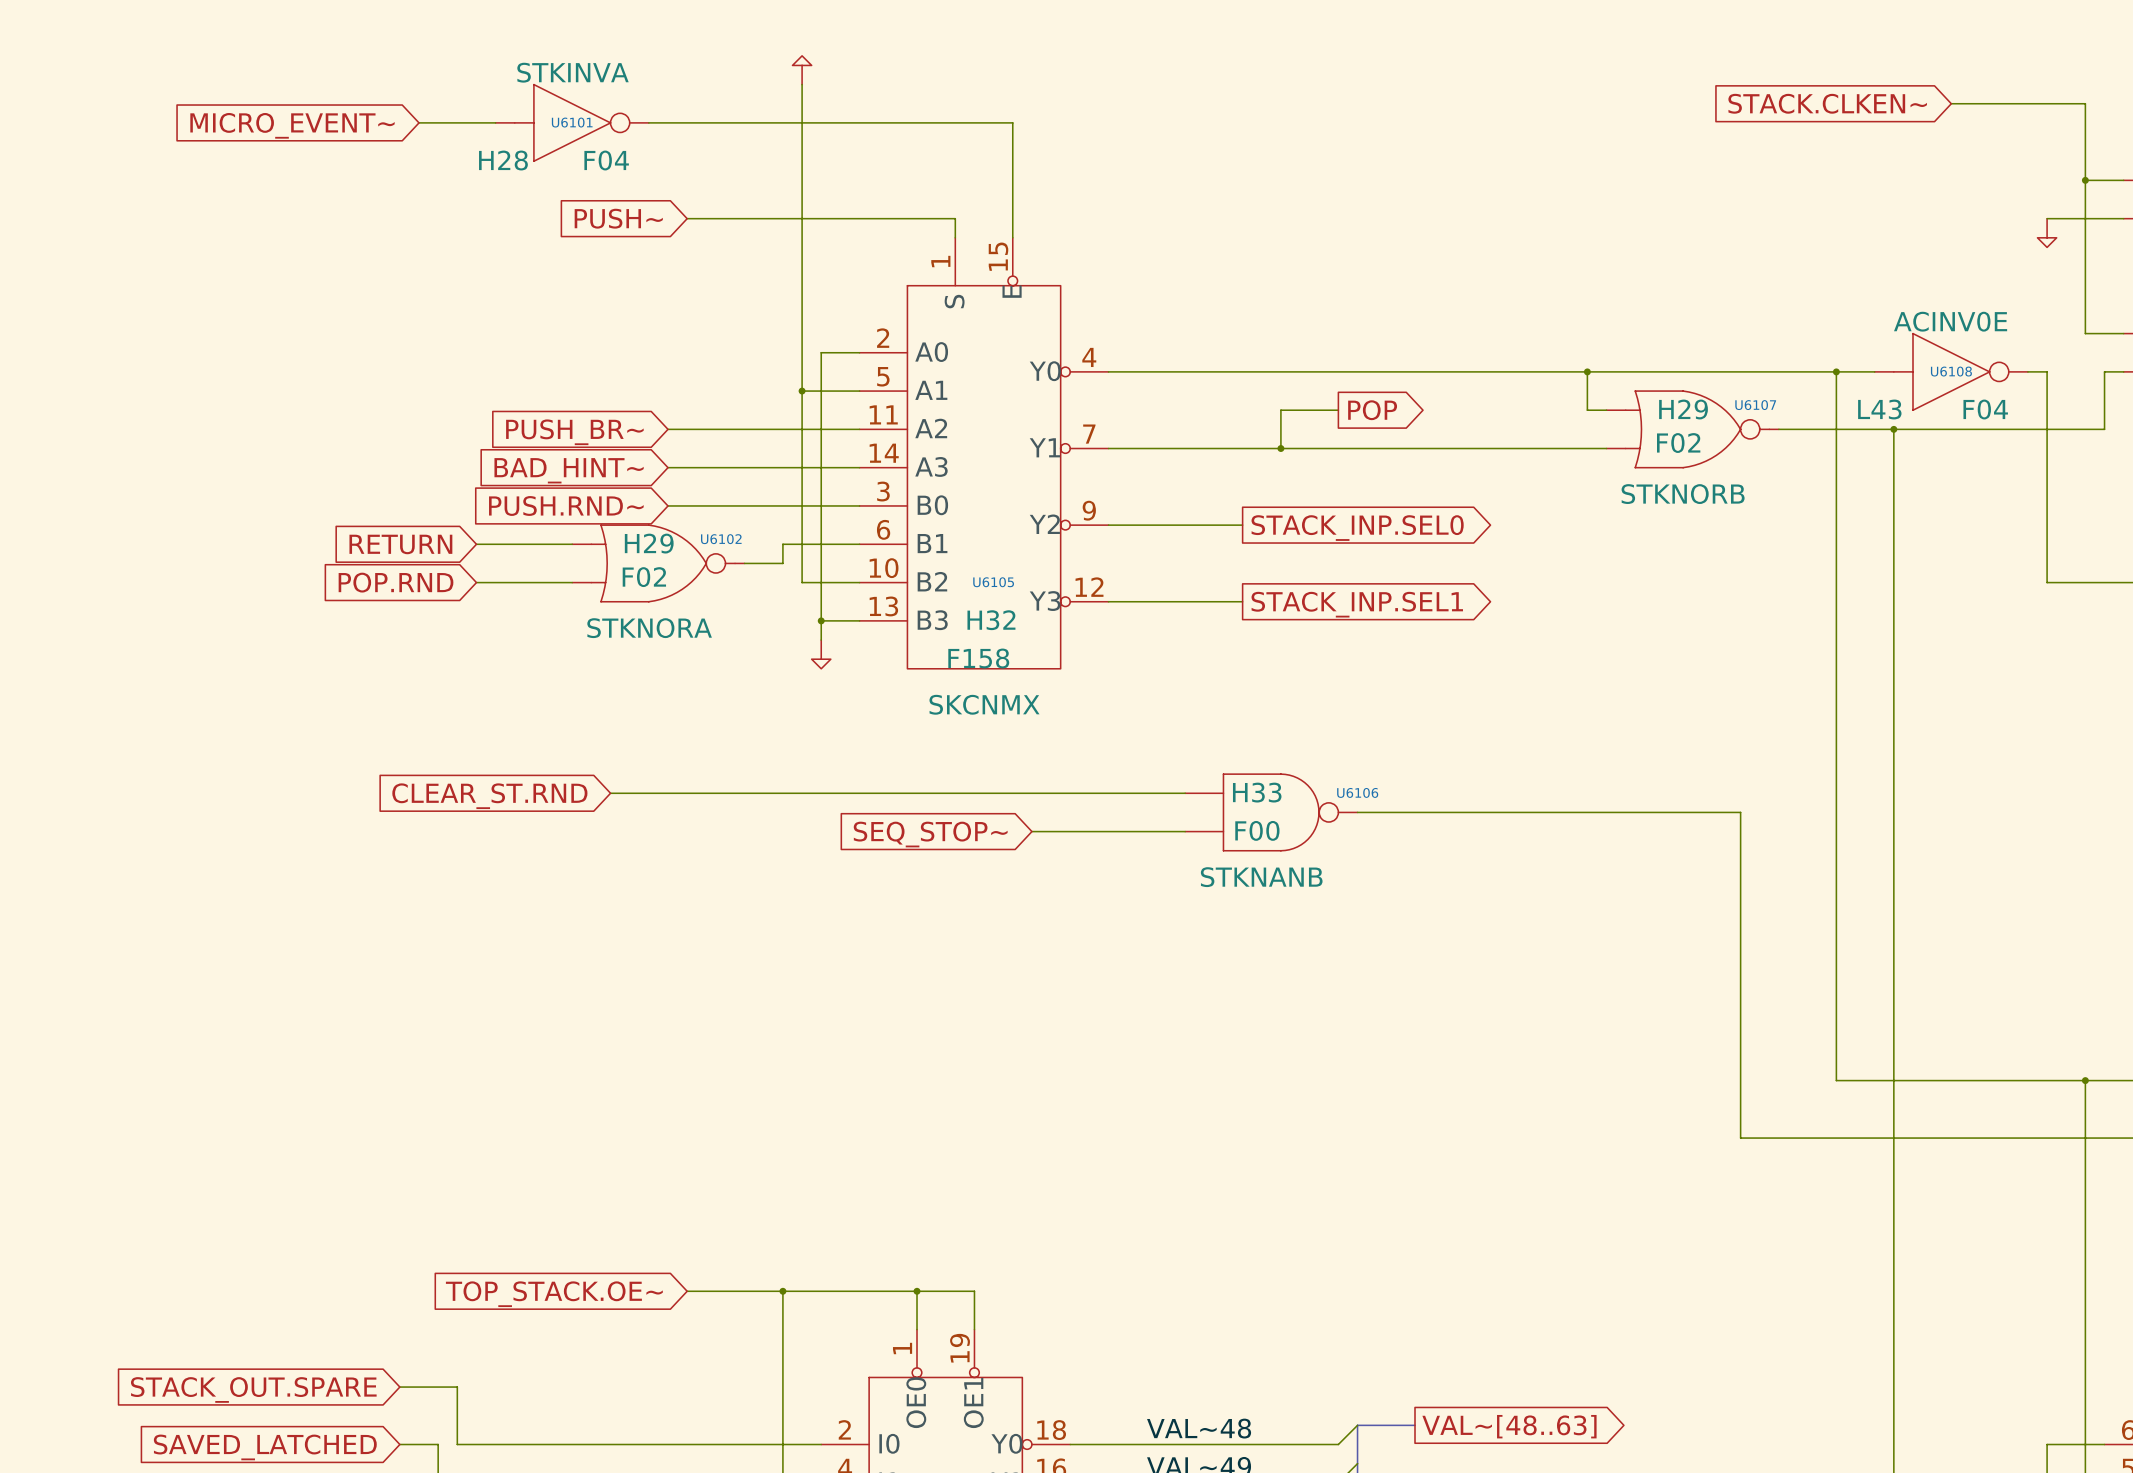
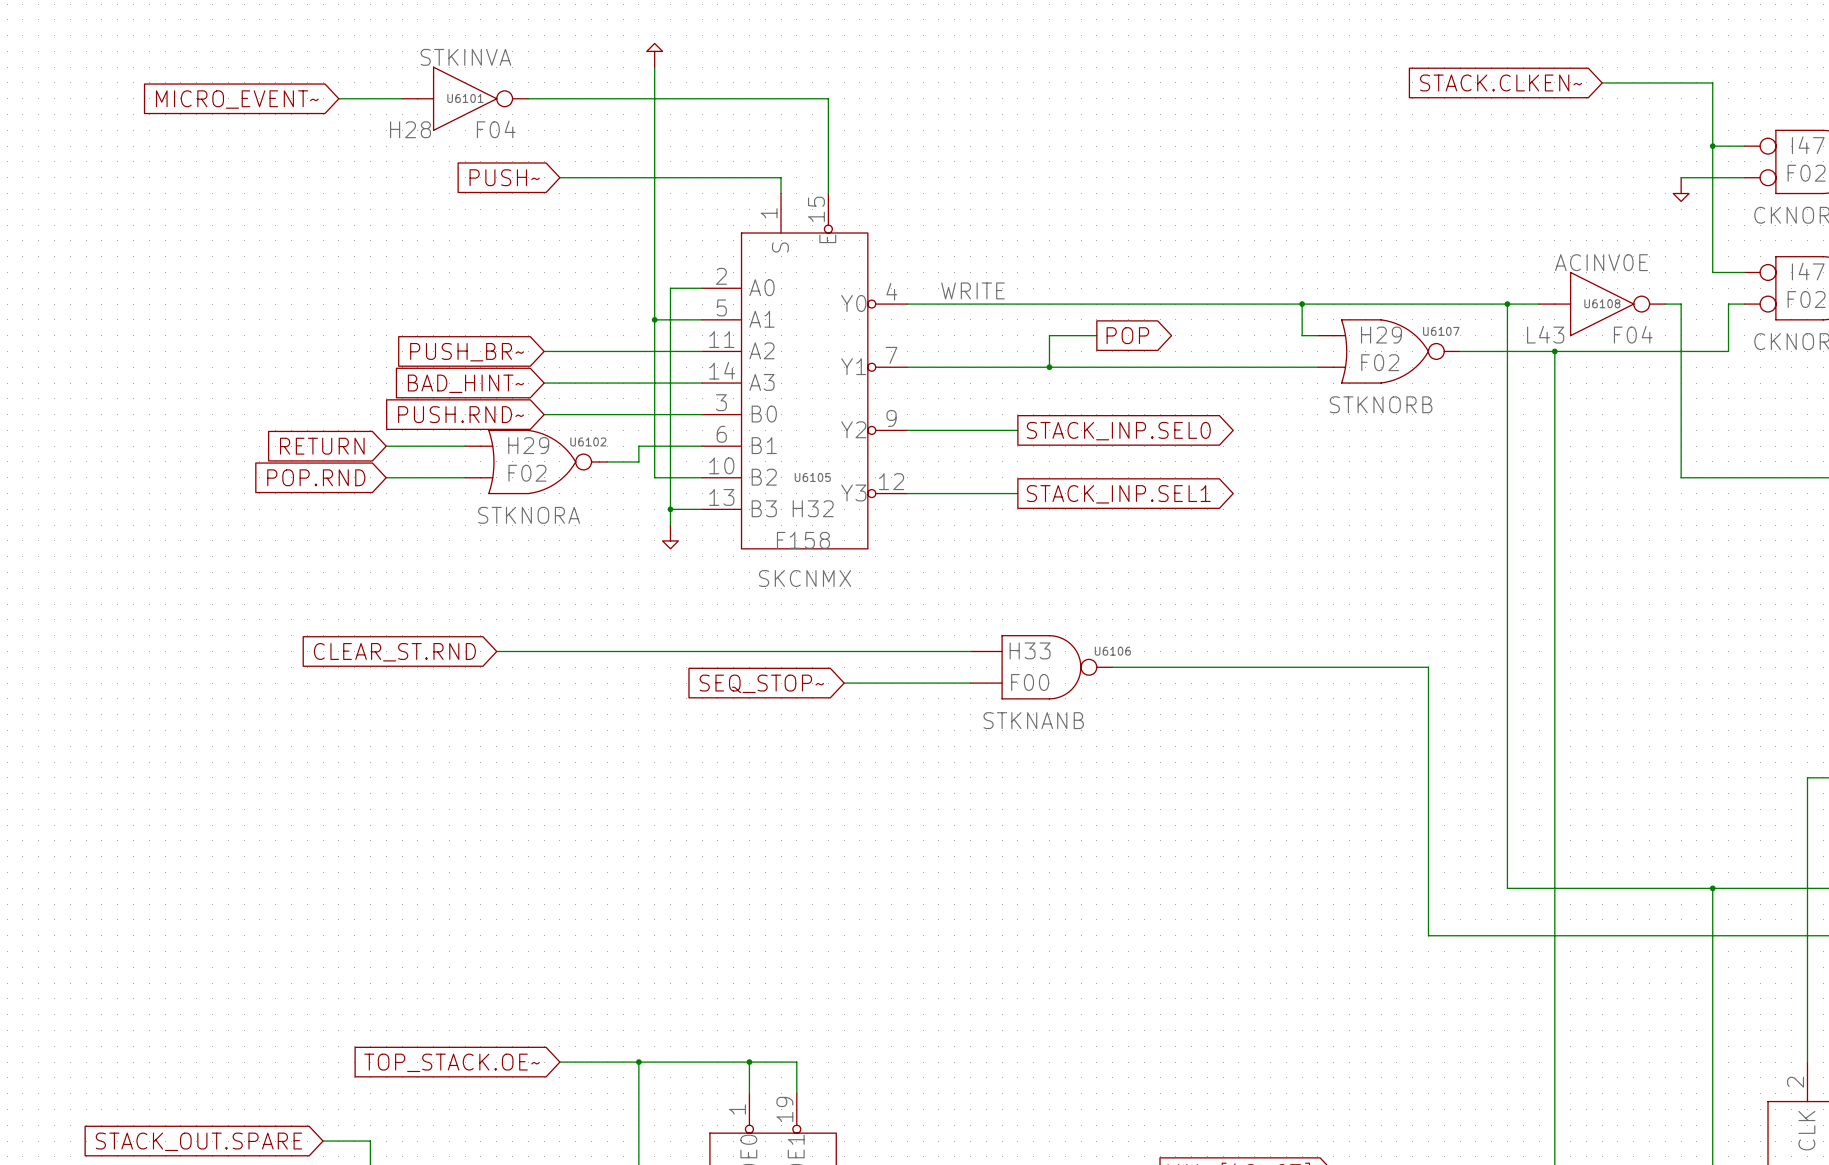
label: none -> WRITE (973, 290)

